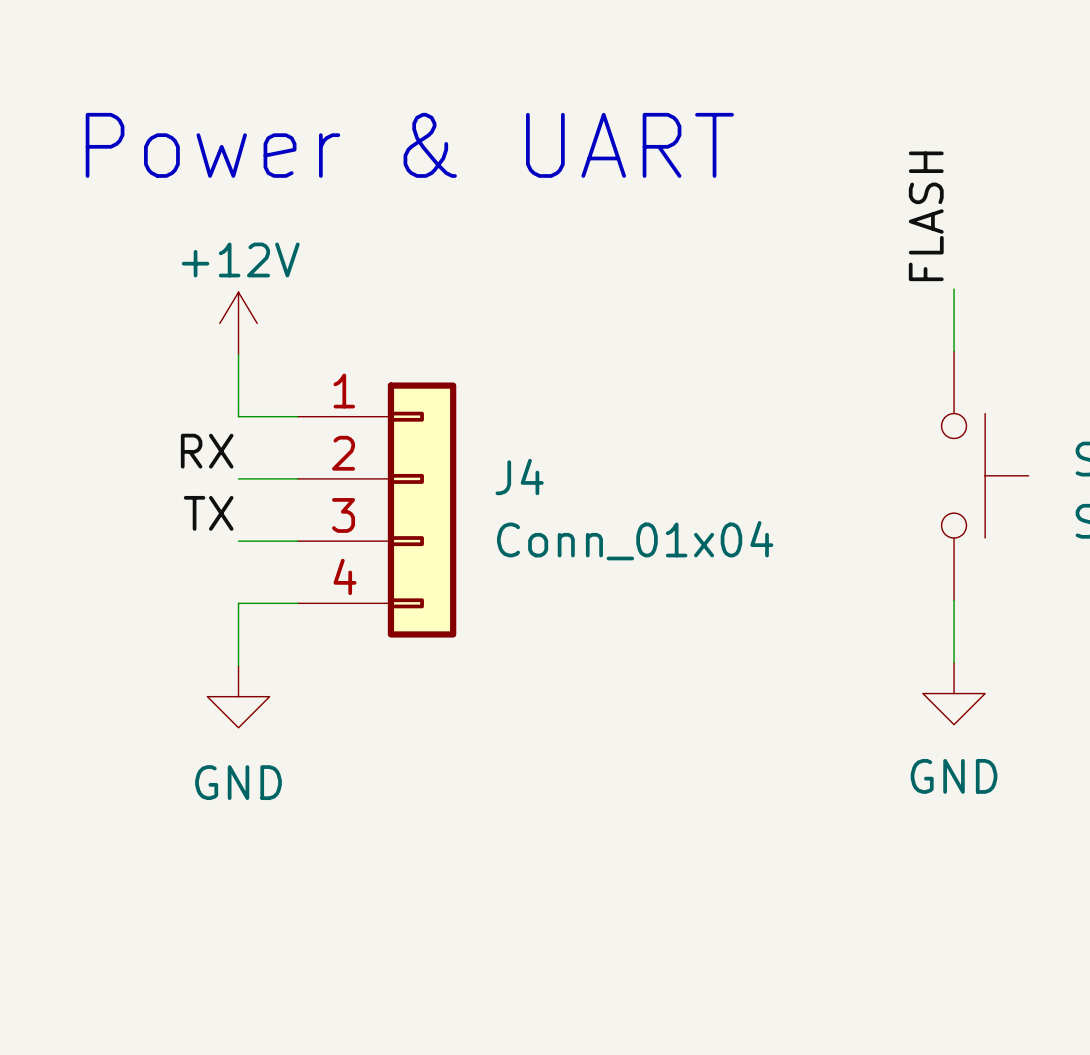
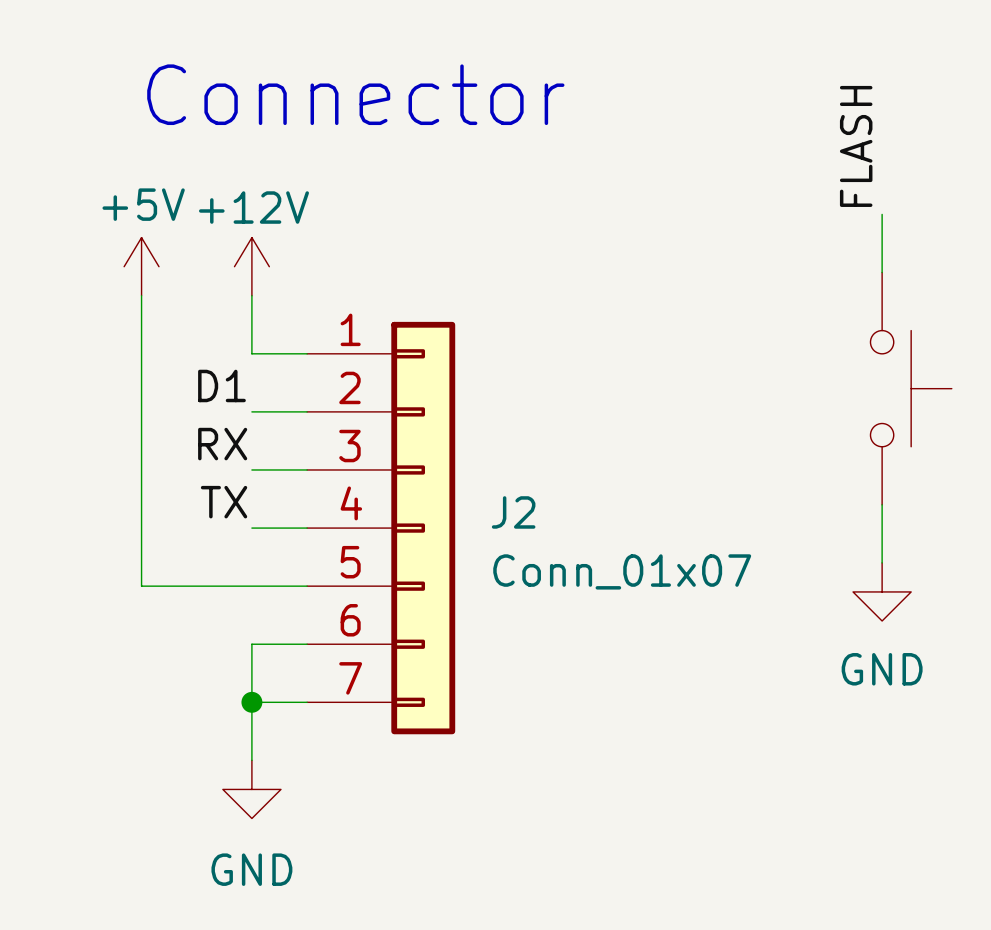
text: Power & UART (409, 145) -> none
text: none -> Connector (355, 94)
power symbol position: +12V (238, 323) -> +12V (251, 266)
power symbol: none -> +5V (141, 266)
wire: (238, 354) (238, 416) (297, 416) -> (251, 295) (251, 353) (307, 353)
wire: none -> (141, 295) (141, 586) (307, 586)
label position: RX (207, 451) -> RX (222, 444)
label: none -> D1 (221, 385)
wire: (238, 478) (297, 478) -> (251, 411) (307, 411)
J4: Conn_01x04 (376, 510) -> none
label position: TX (208, 513) -> TX (224, 502)
wire: (238, 541) (297, 541) -> (251, 469) (307, 469)
wire: (297, 603) (238, 603) (238, 665) -> none
wire: none -> (251, 528) (307, 528)
J2: none -> Conn_01x07 (381, 528)
power symbol position: GND (238, 696) -> GND (251, 789)
wire: none -> (307, 644) (251, 644) (251, 760)
wire: none -> (251, 702) (307, 702)
junction: none -> (251, 702)

